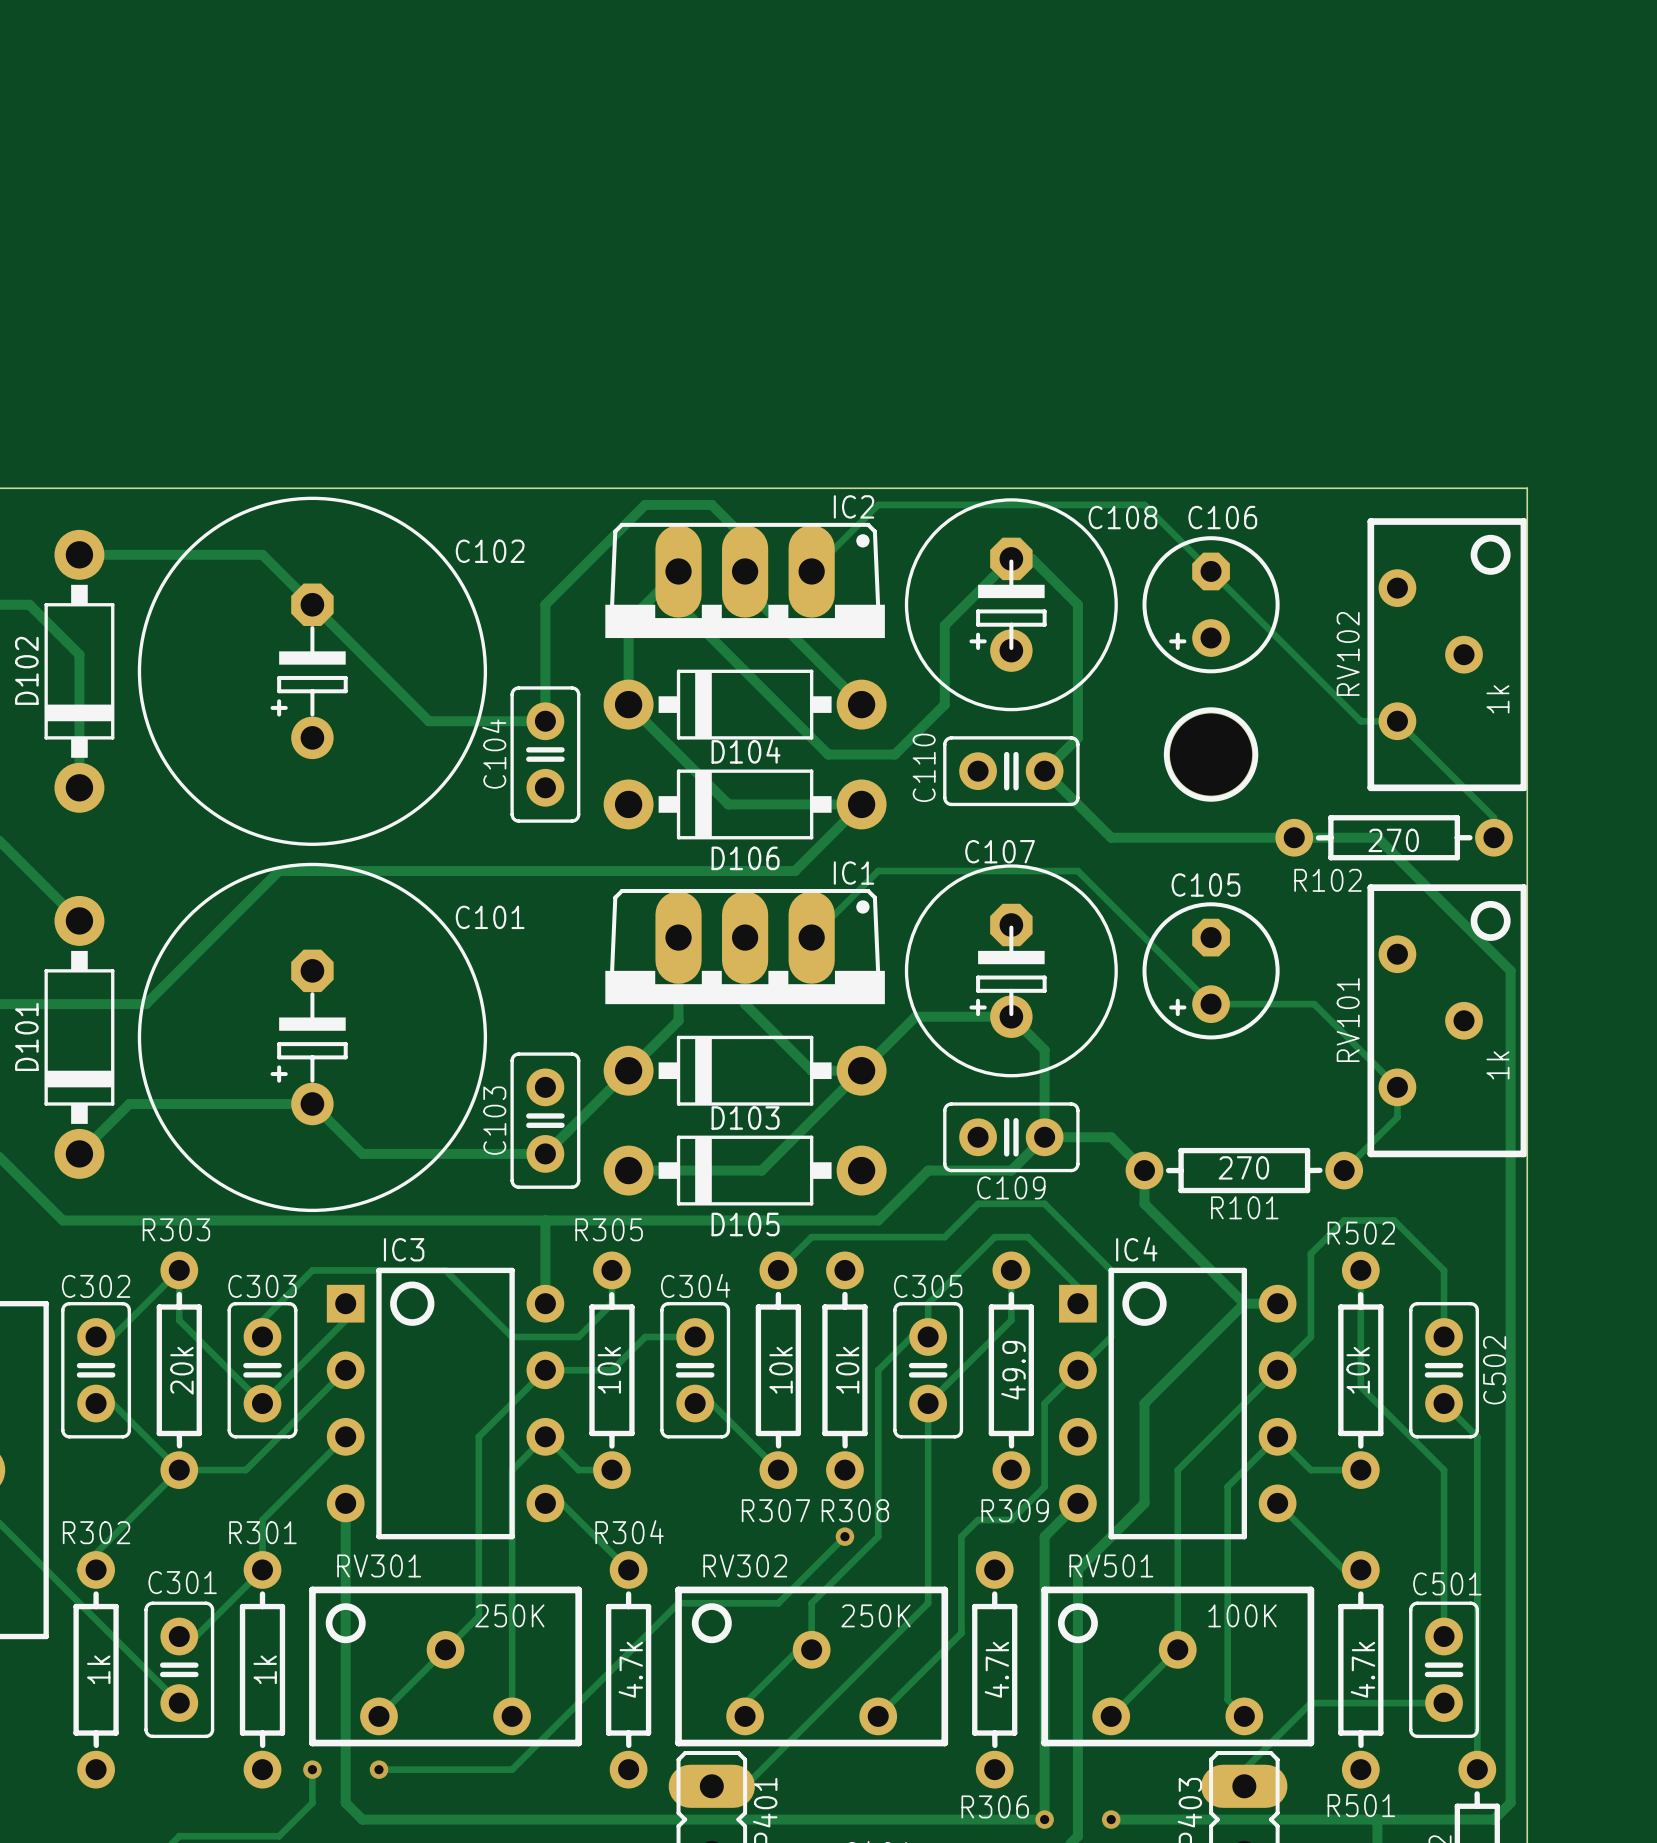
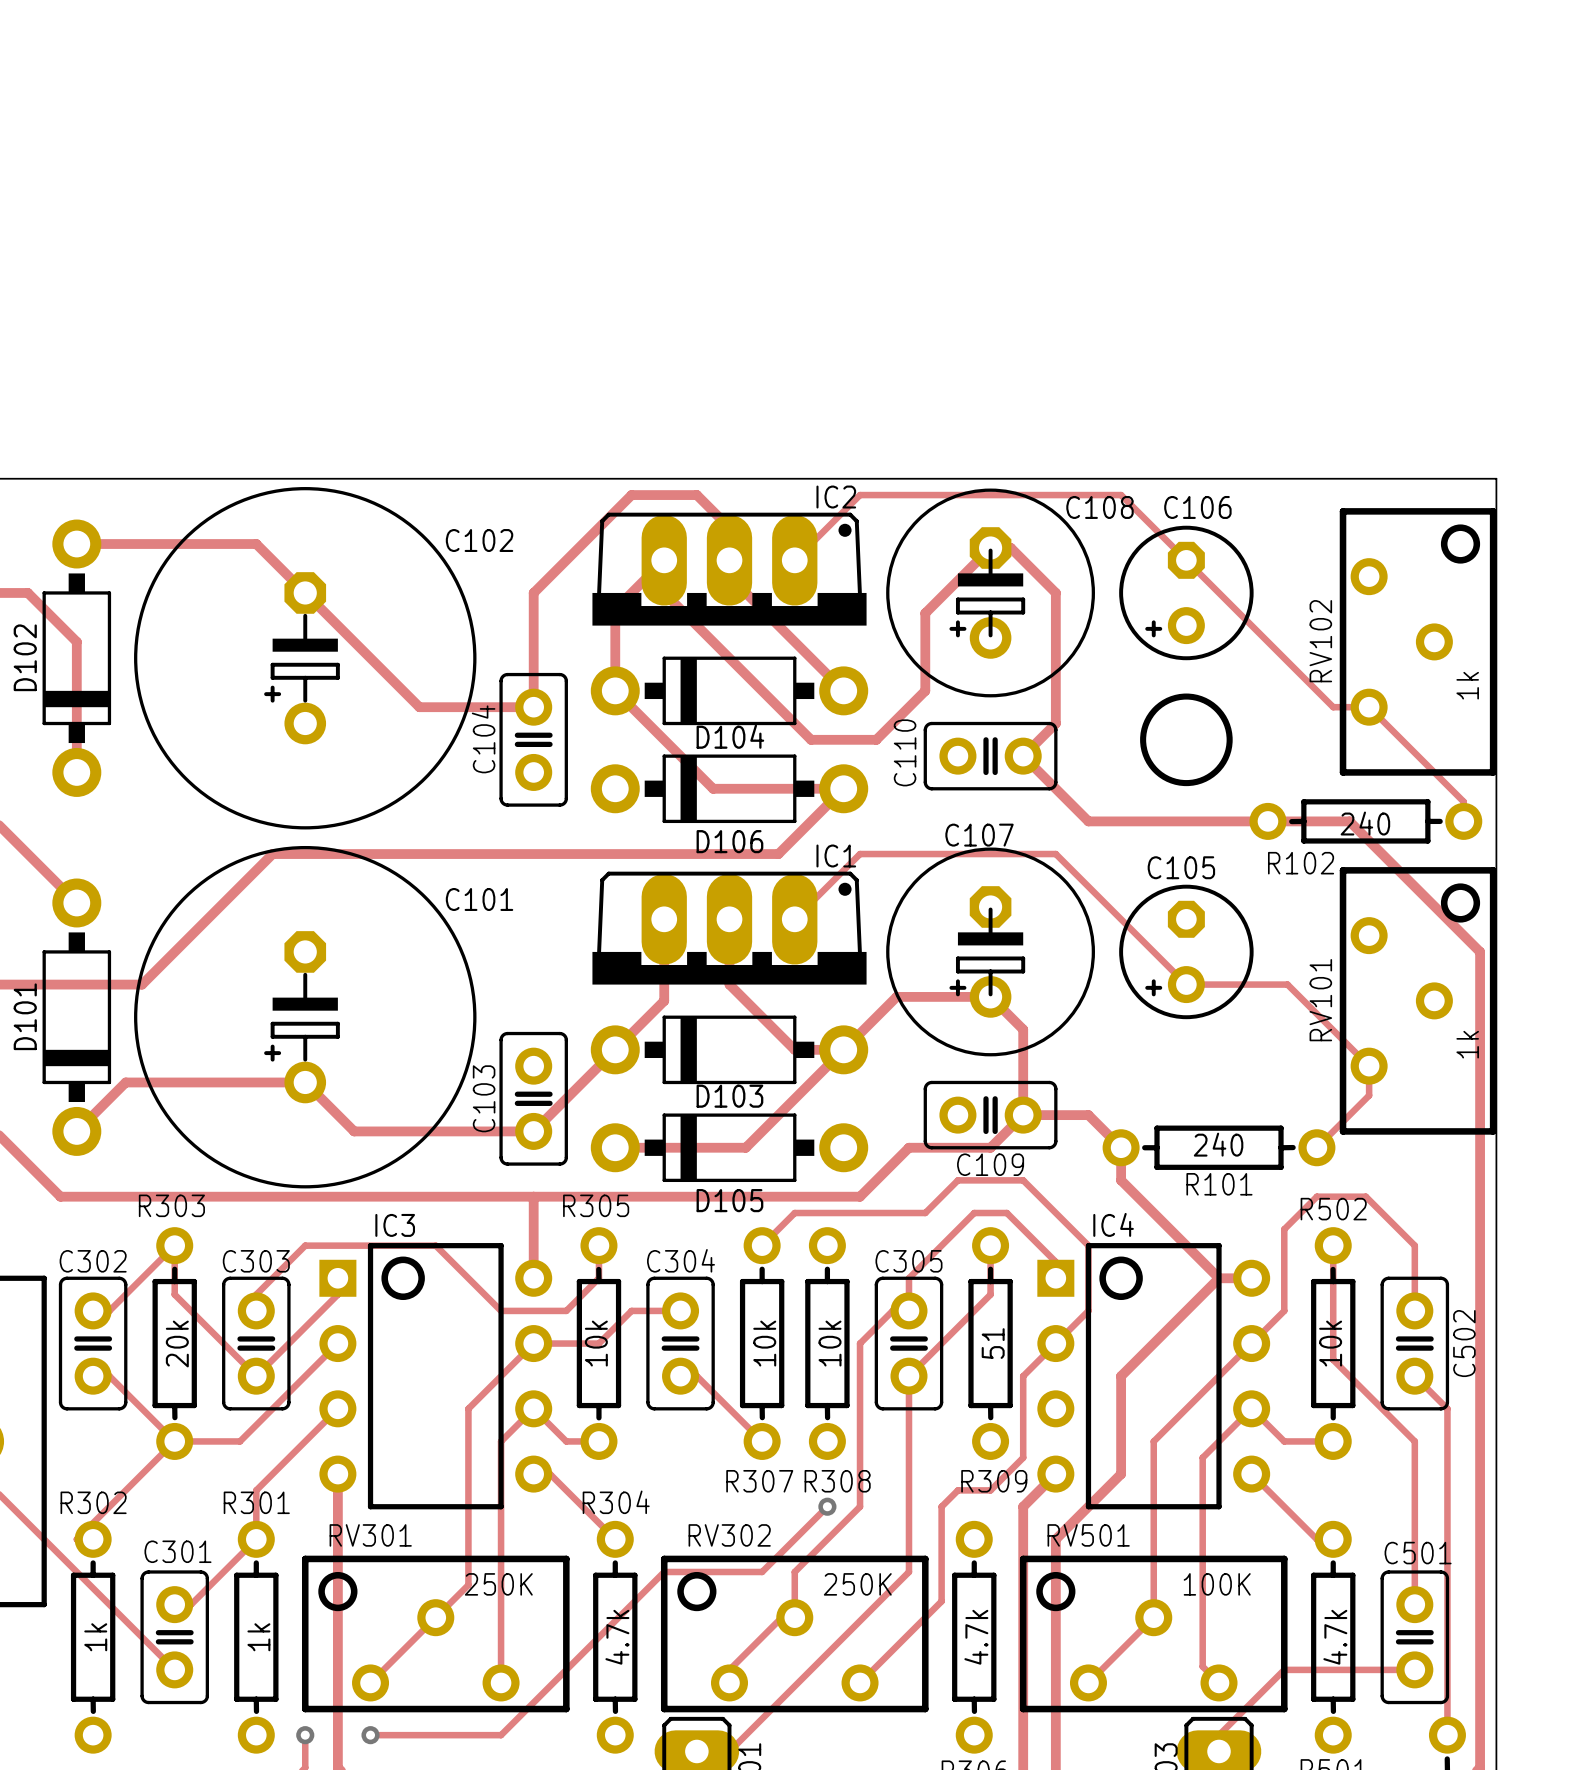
R102 value: 270 (1393, 840) -> 240 (1365, 823)
R101 value: 270 (1243, 1167) -> 240 (1218, 1144)
R309 value: 49.9 (1013, 1370) -> 51 (993, 1343)

